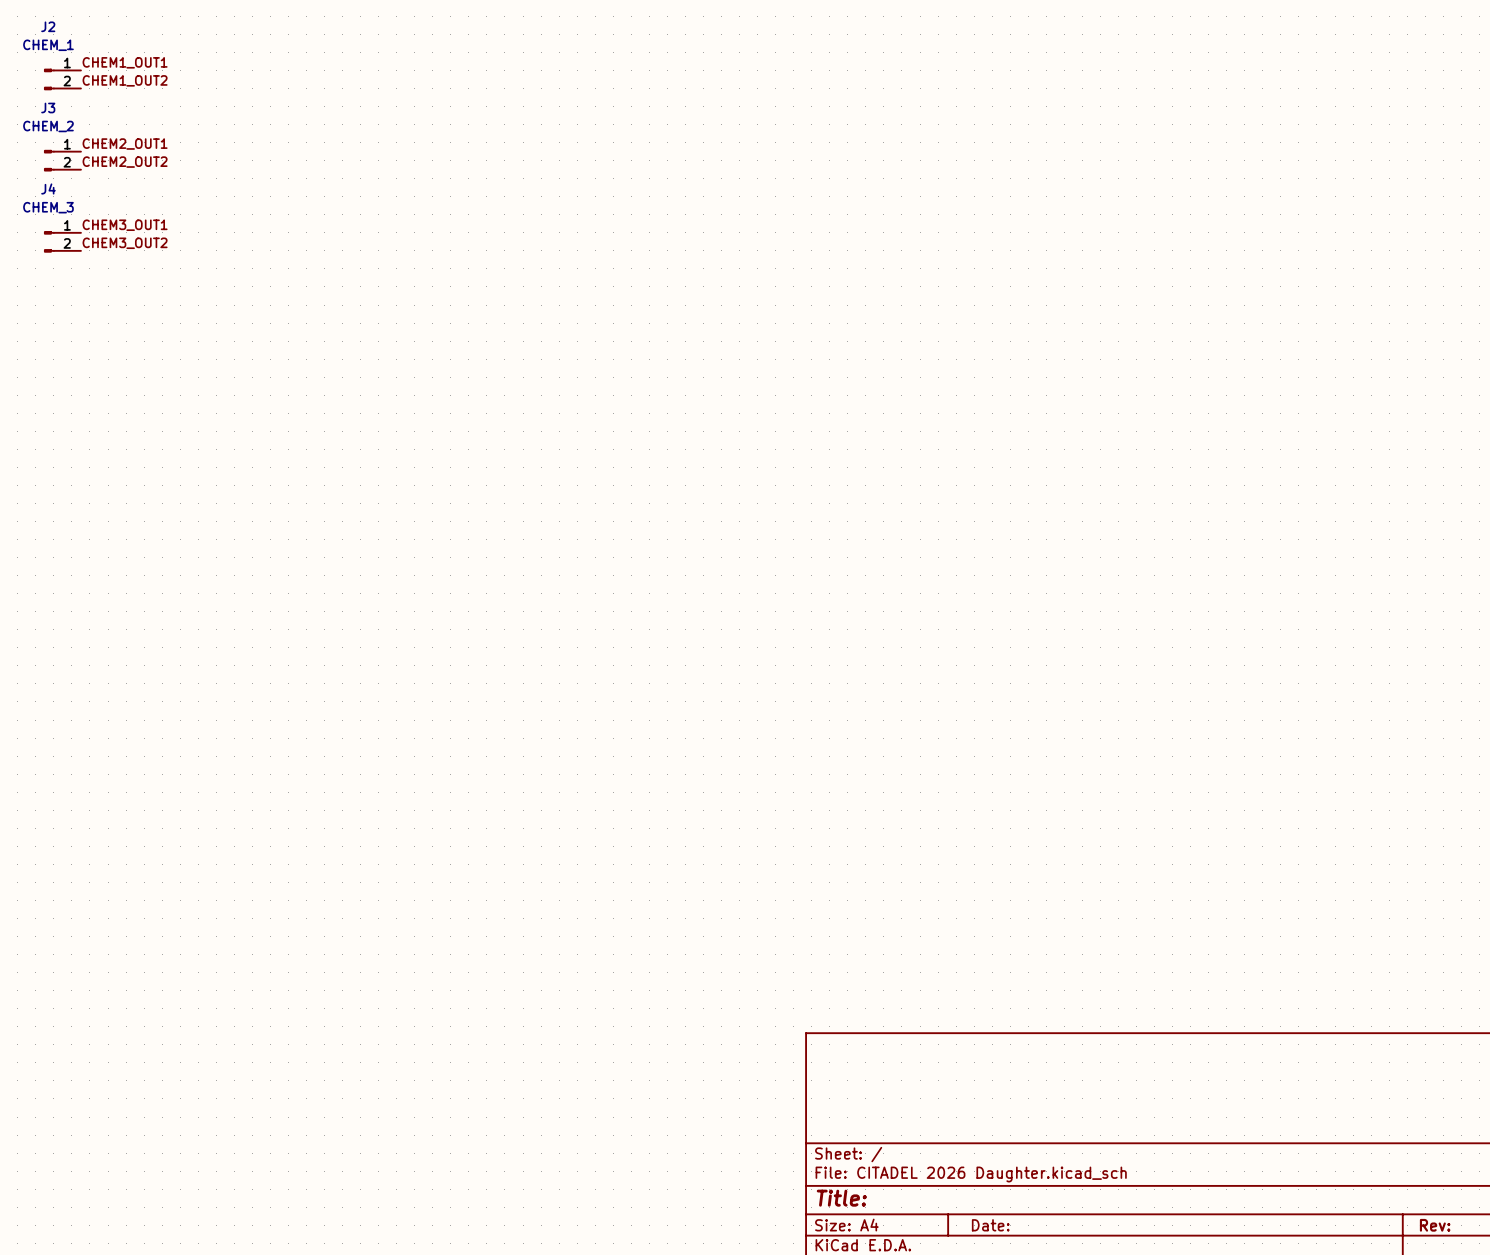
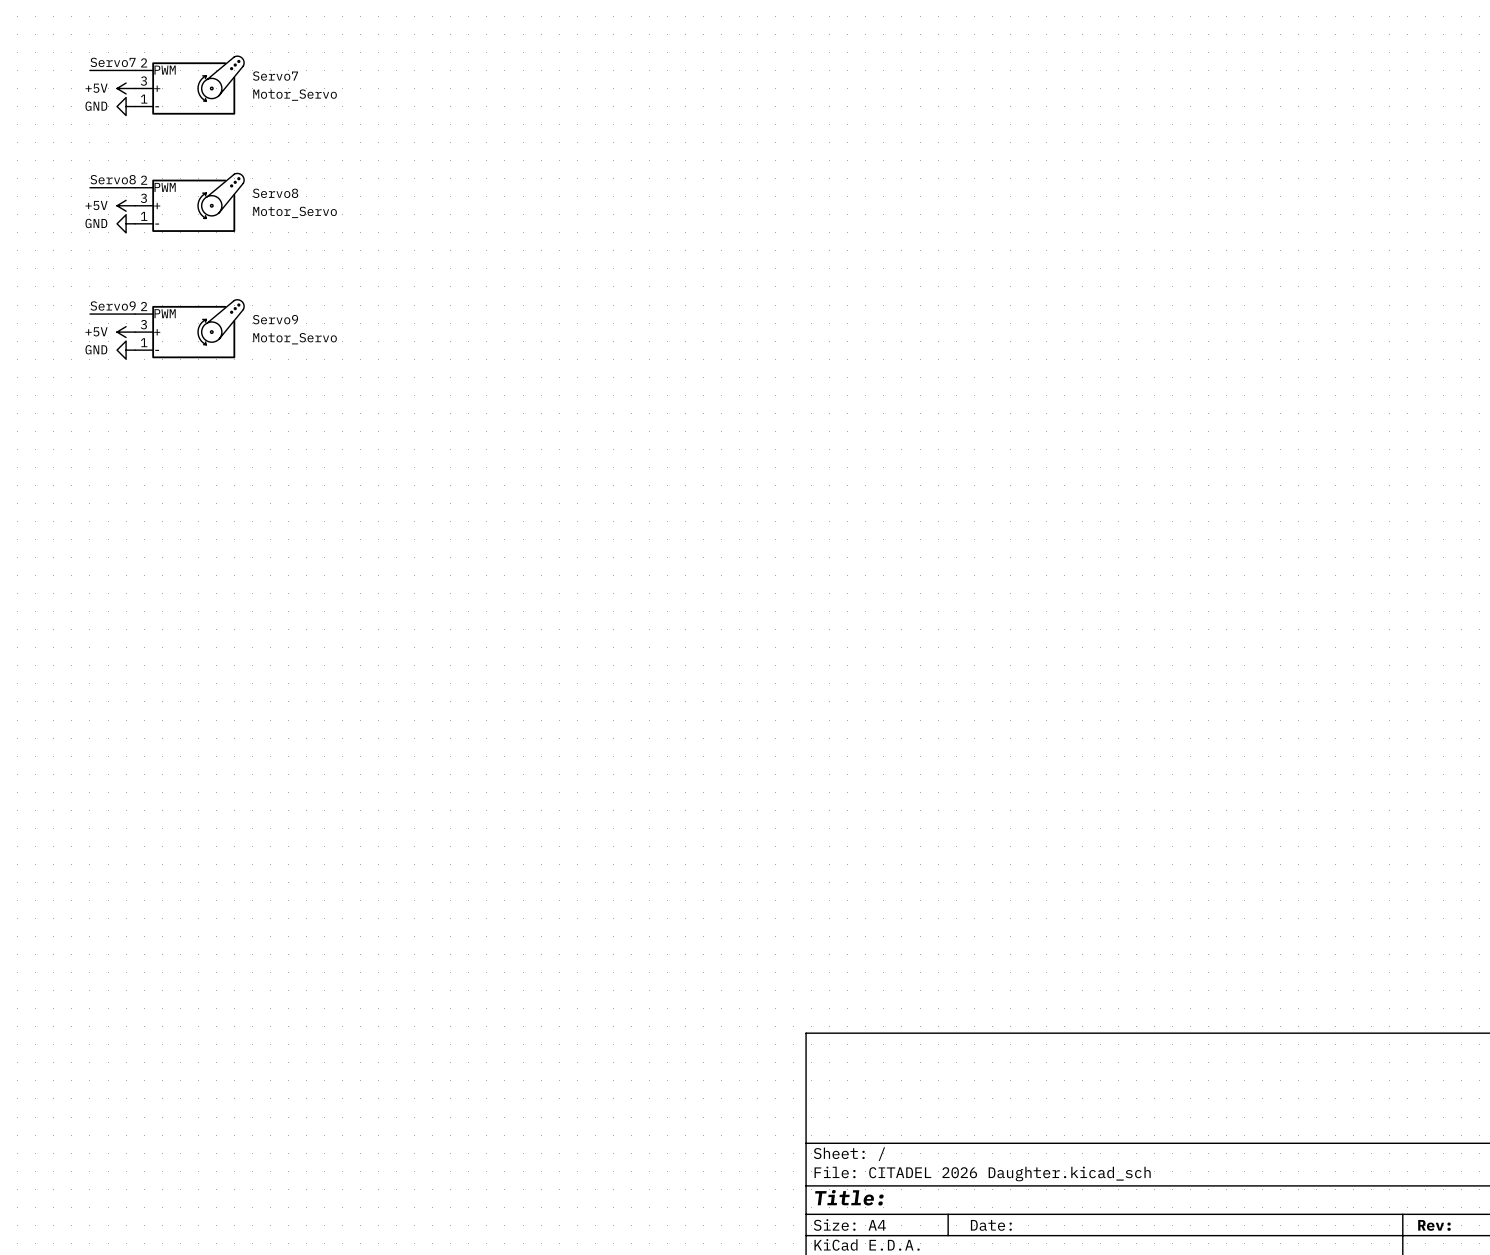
label: none -> Servo7 (113, 62)
label: CHEM1_OUT1 (125, 62) -> none
wire: none -> (89, 70) (135, 70)
J2: CHEM_1 (62, 79) -> none
label: CHEM1_OUT2 (125, 80) -> none
Servo7: none -> Motor_Servo (189, 85)
power symbol: none -> +5V (126, 88)
power symbol: none -> GND (126, 106)
label: CHEM2_OUT1 (125, 144) -> none
J3: CHEM_2 (62, 160) -> none
label: CHEM2_OUT2 (125, 162) -> none
label: none -> Servo8 (113, 179)
wire: none -> (89, 187) (135, 187)
Servo8: none -> Motor_Servo (189, 202)
power symbol: none -> +5V (126, 205)
power symbol: none -> GND (126, 223)
label: CHEM3_OUT1 (125, 225) -> none
J4: CHEM_3 (62, 241) -> none
label: CHEM3_OUT2 (125, 243) -> none
label: none -> Servo9 (113, 305)
wire: none -> (89, 314) (135, 314)
Servo9: none -> Motor_Servo (189, 329)
power symbol: none -> +5V (126, 332)
power symbol: none -> GND (126, 350)

